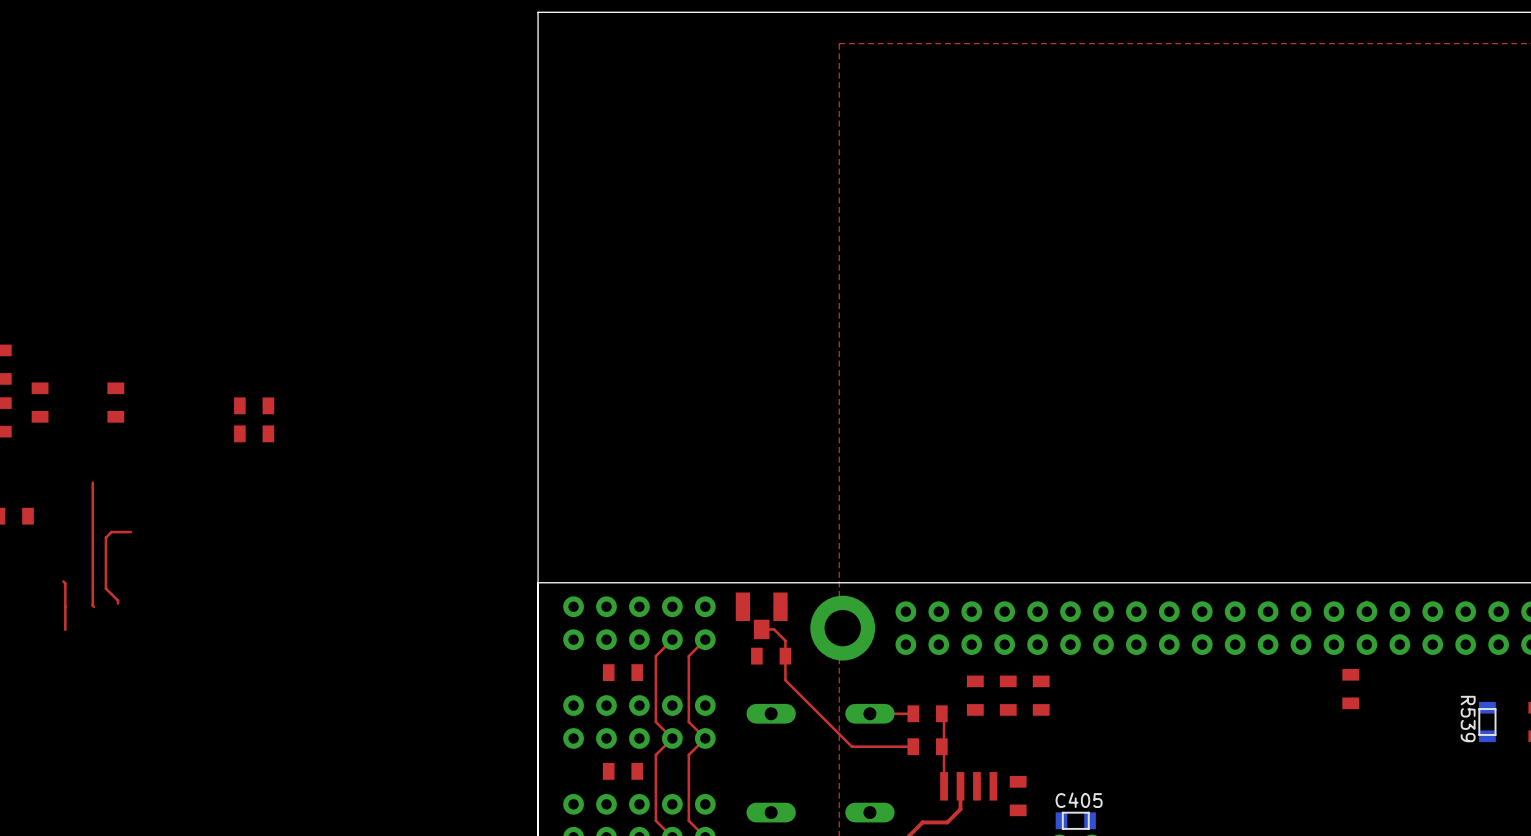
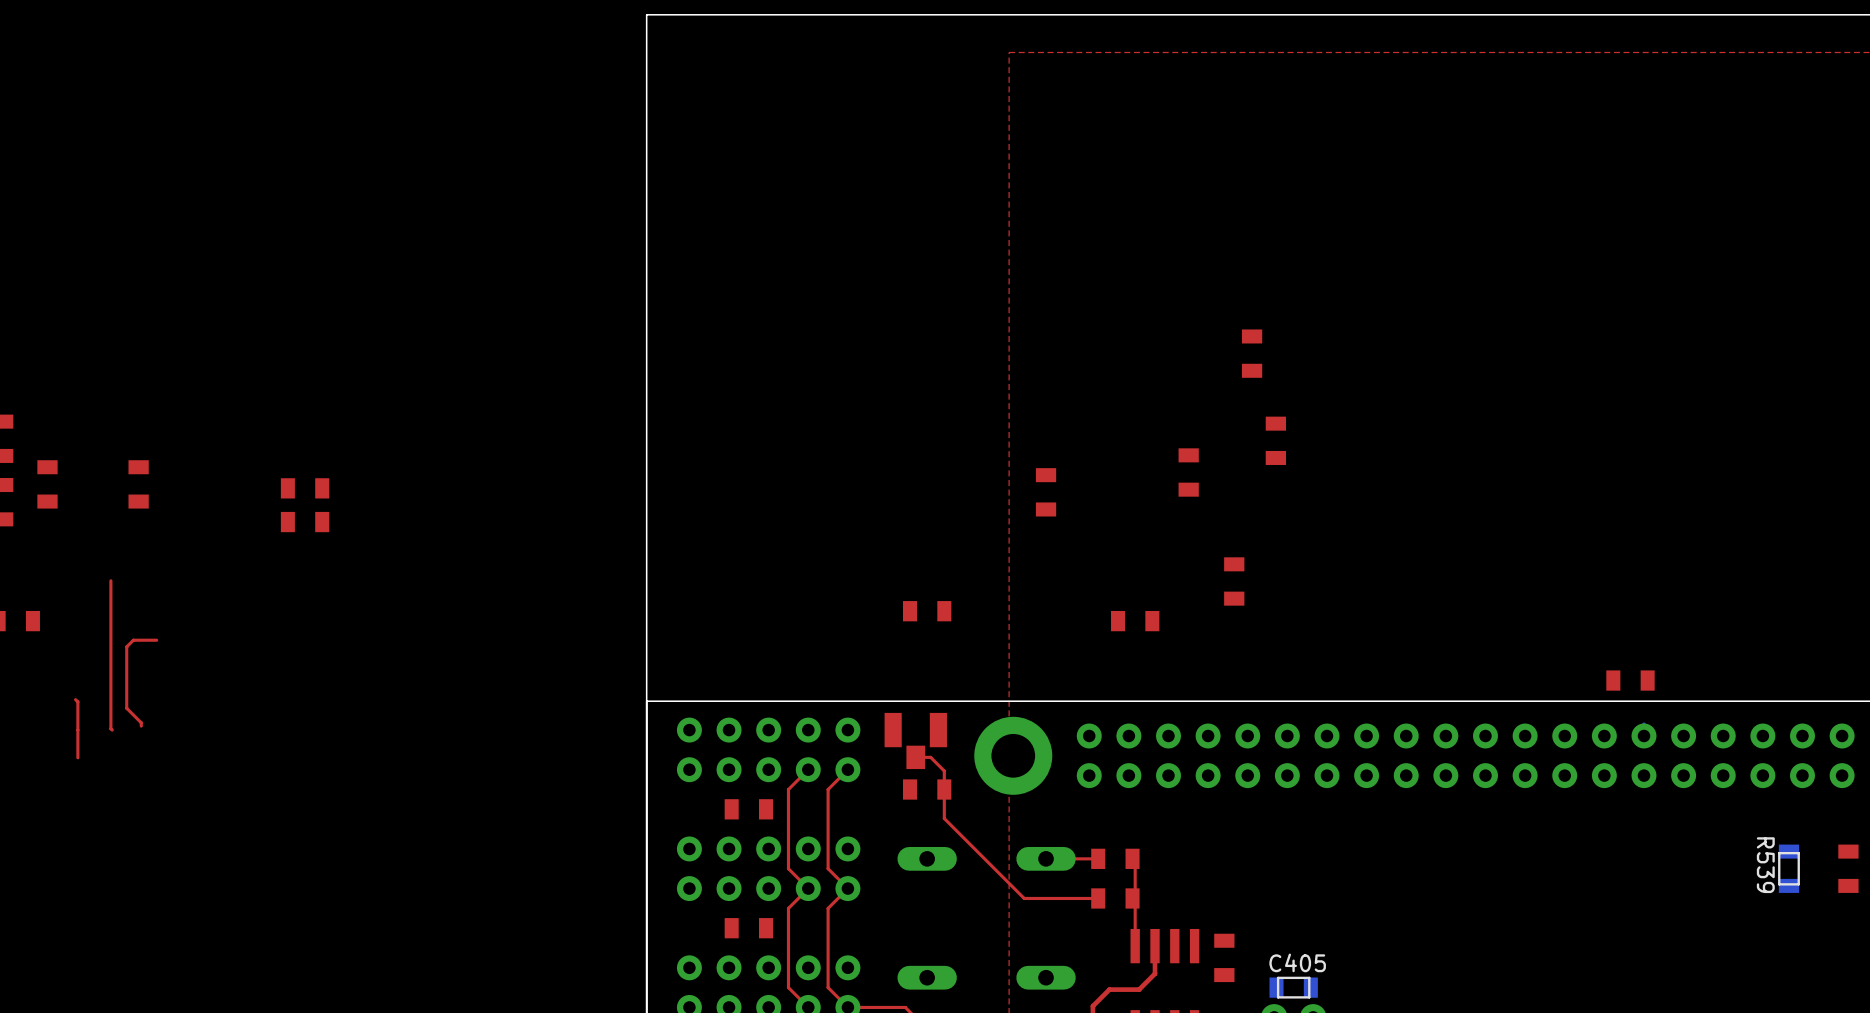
part: none -> (1252, 353)
part: none -> (1275, 440)
part: none -> (1188, 472)
part: none -> (1046, 492)
part: none -> (1234, 581)
part: none -> (927, 611)
part: none -> (1135, 621)
part rotation: 0° (1350, 689) -> 90° clockwise (1630, 680)
part position: (1350, 689) -> (1630, 680)
part: (975, 695) -> none
part: (1008, 695) -> none
part: (1041, 695) -> none

